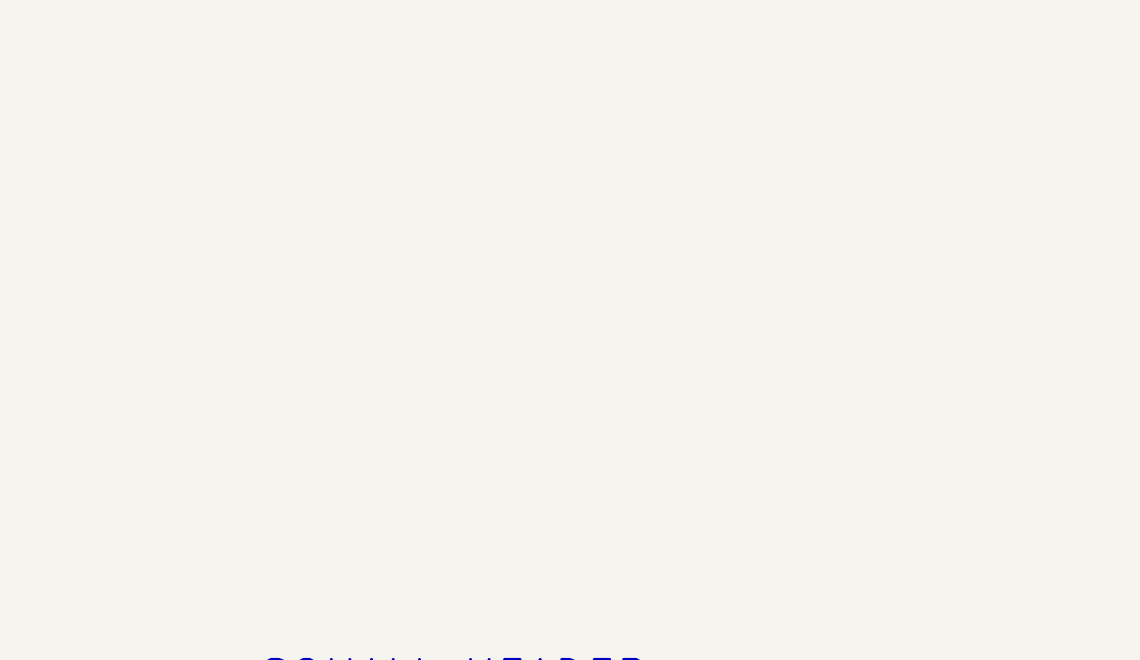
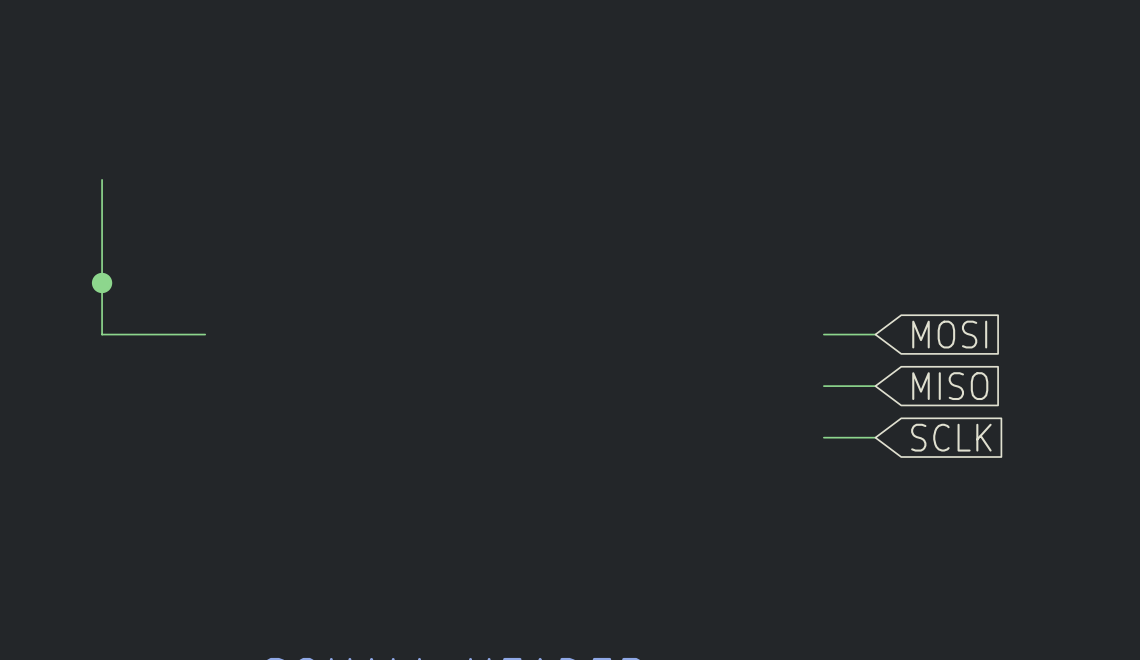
wire: none -> (102, 179) (102, 334) (205, 334)
junction: none -> (102, 282)
wire: none -> (823, 334) (875, 334)
global label: none -> MOSI (949, 334)
wire: none -> (823, 386) (875, 386)
global label: none -> MISO (950, 386)
wire: none -> (823, 437) (875, 437)
global label: none -> SCLK (951, 437)

